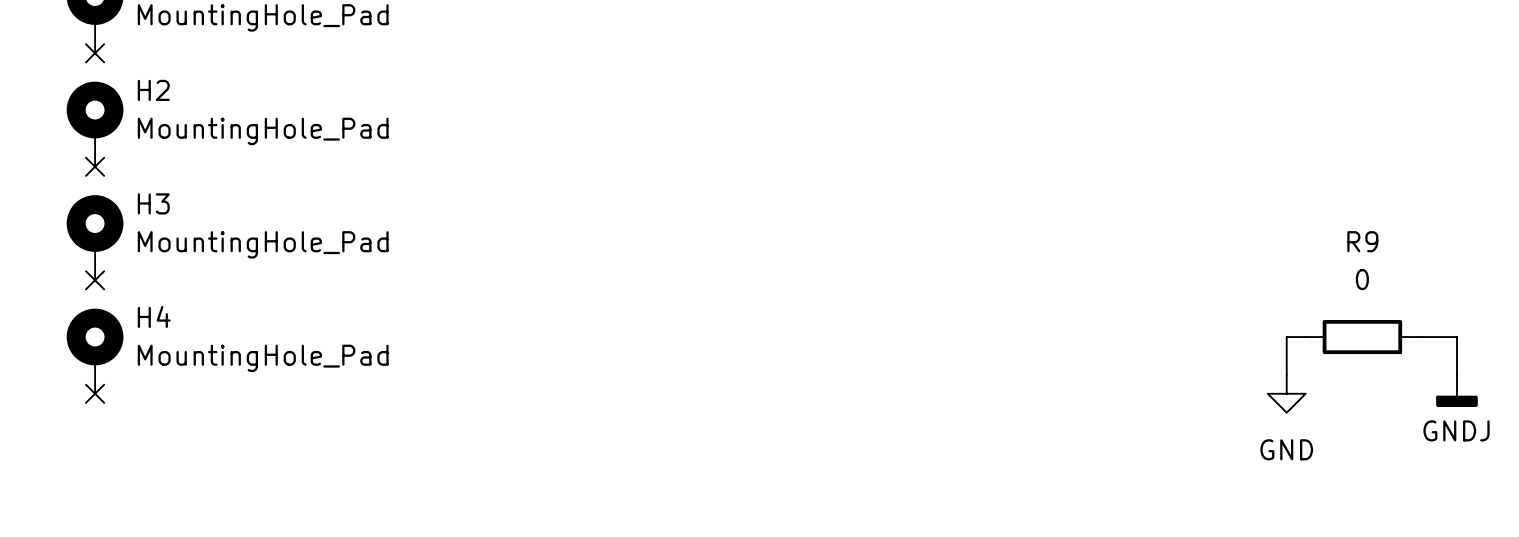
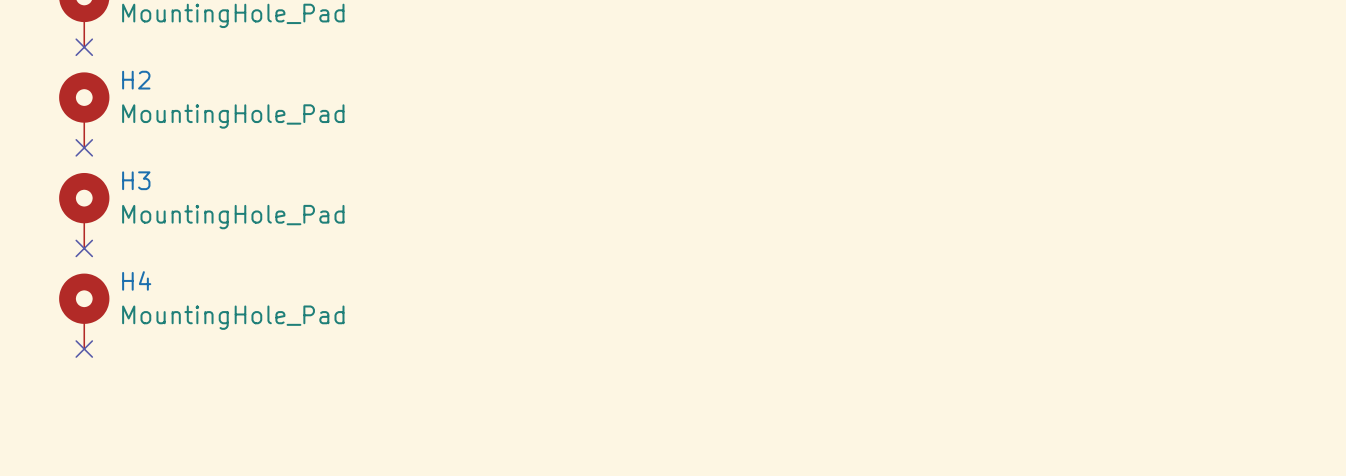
wire: (1305, 337) (1286, 337) (1286, 374) -> none
R9: 0 (1362, 337) -> none
wire: (1419, 337) (1456, 337) (1456, 374) -> none
power symbol: GNDJ (1456, 390) -> none
power symbol: GND (1286, 393) -> none

